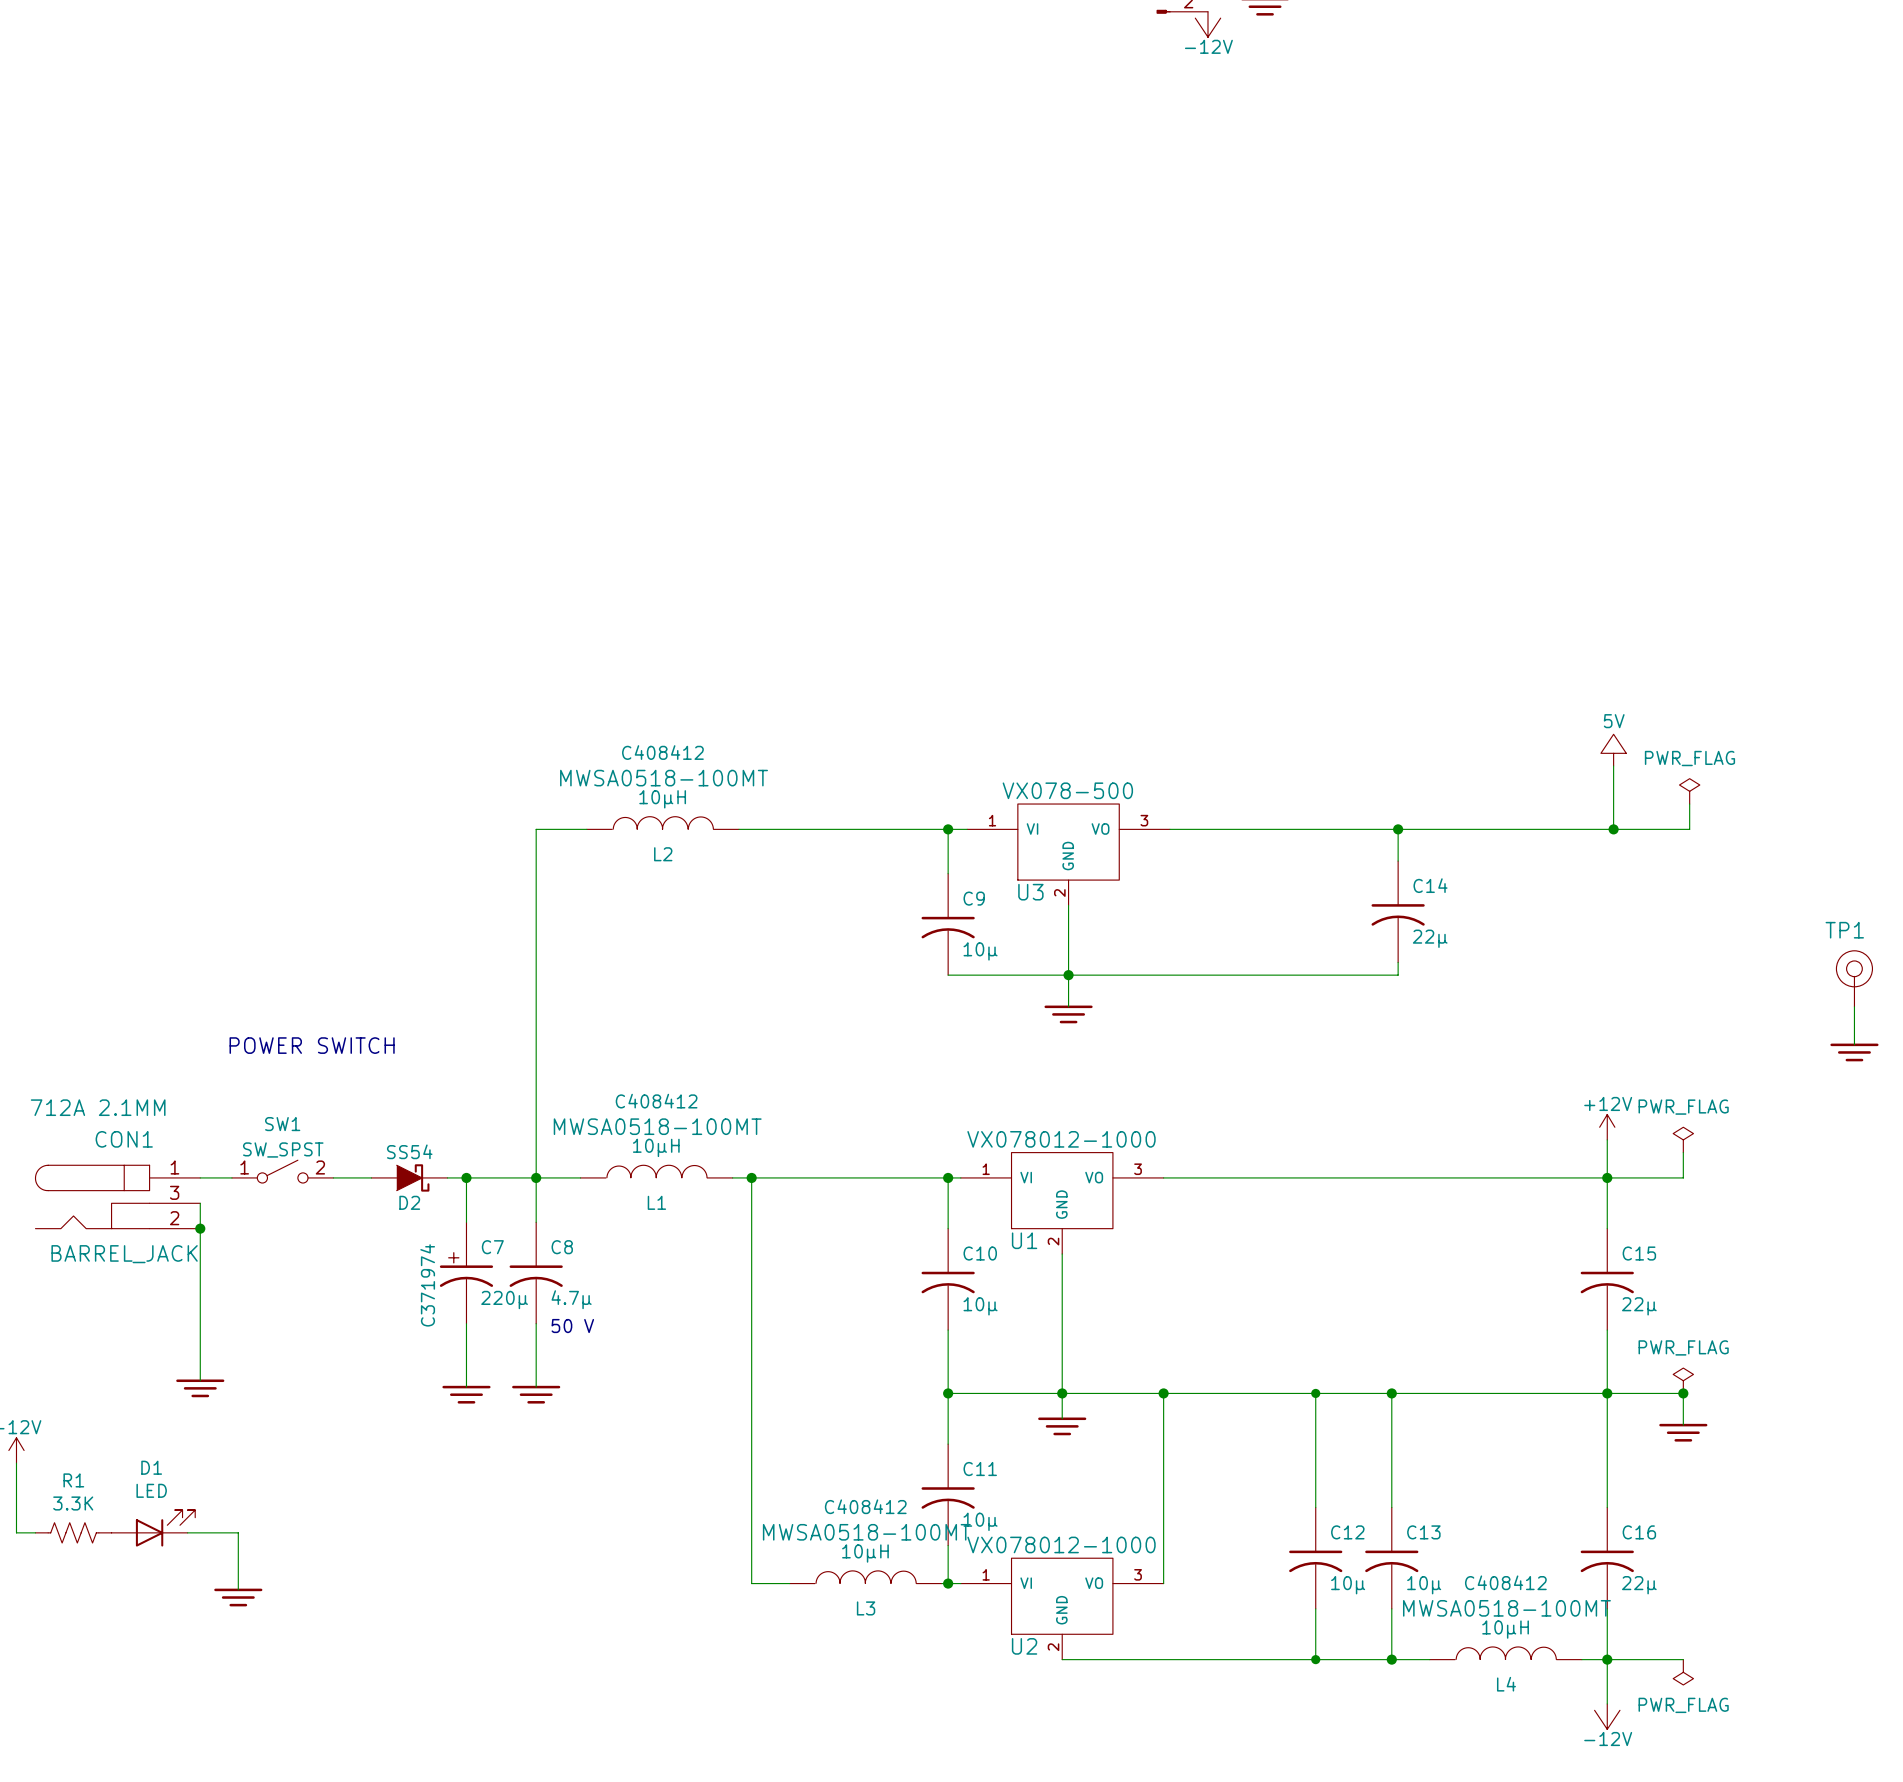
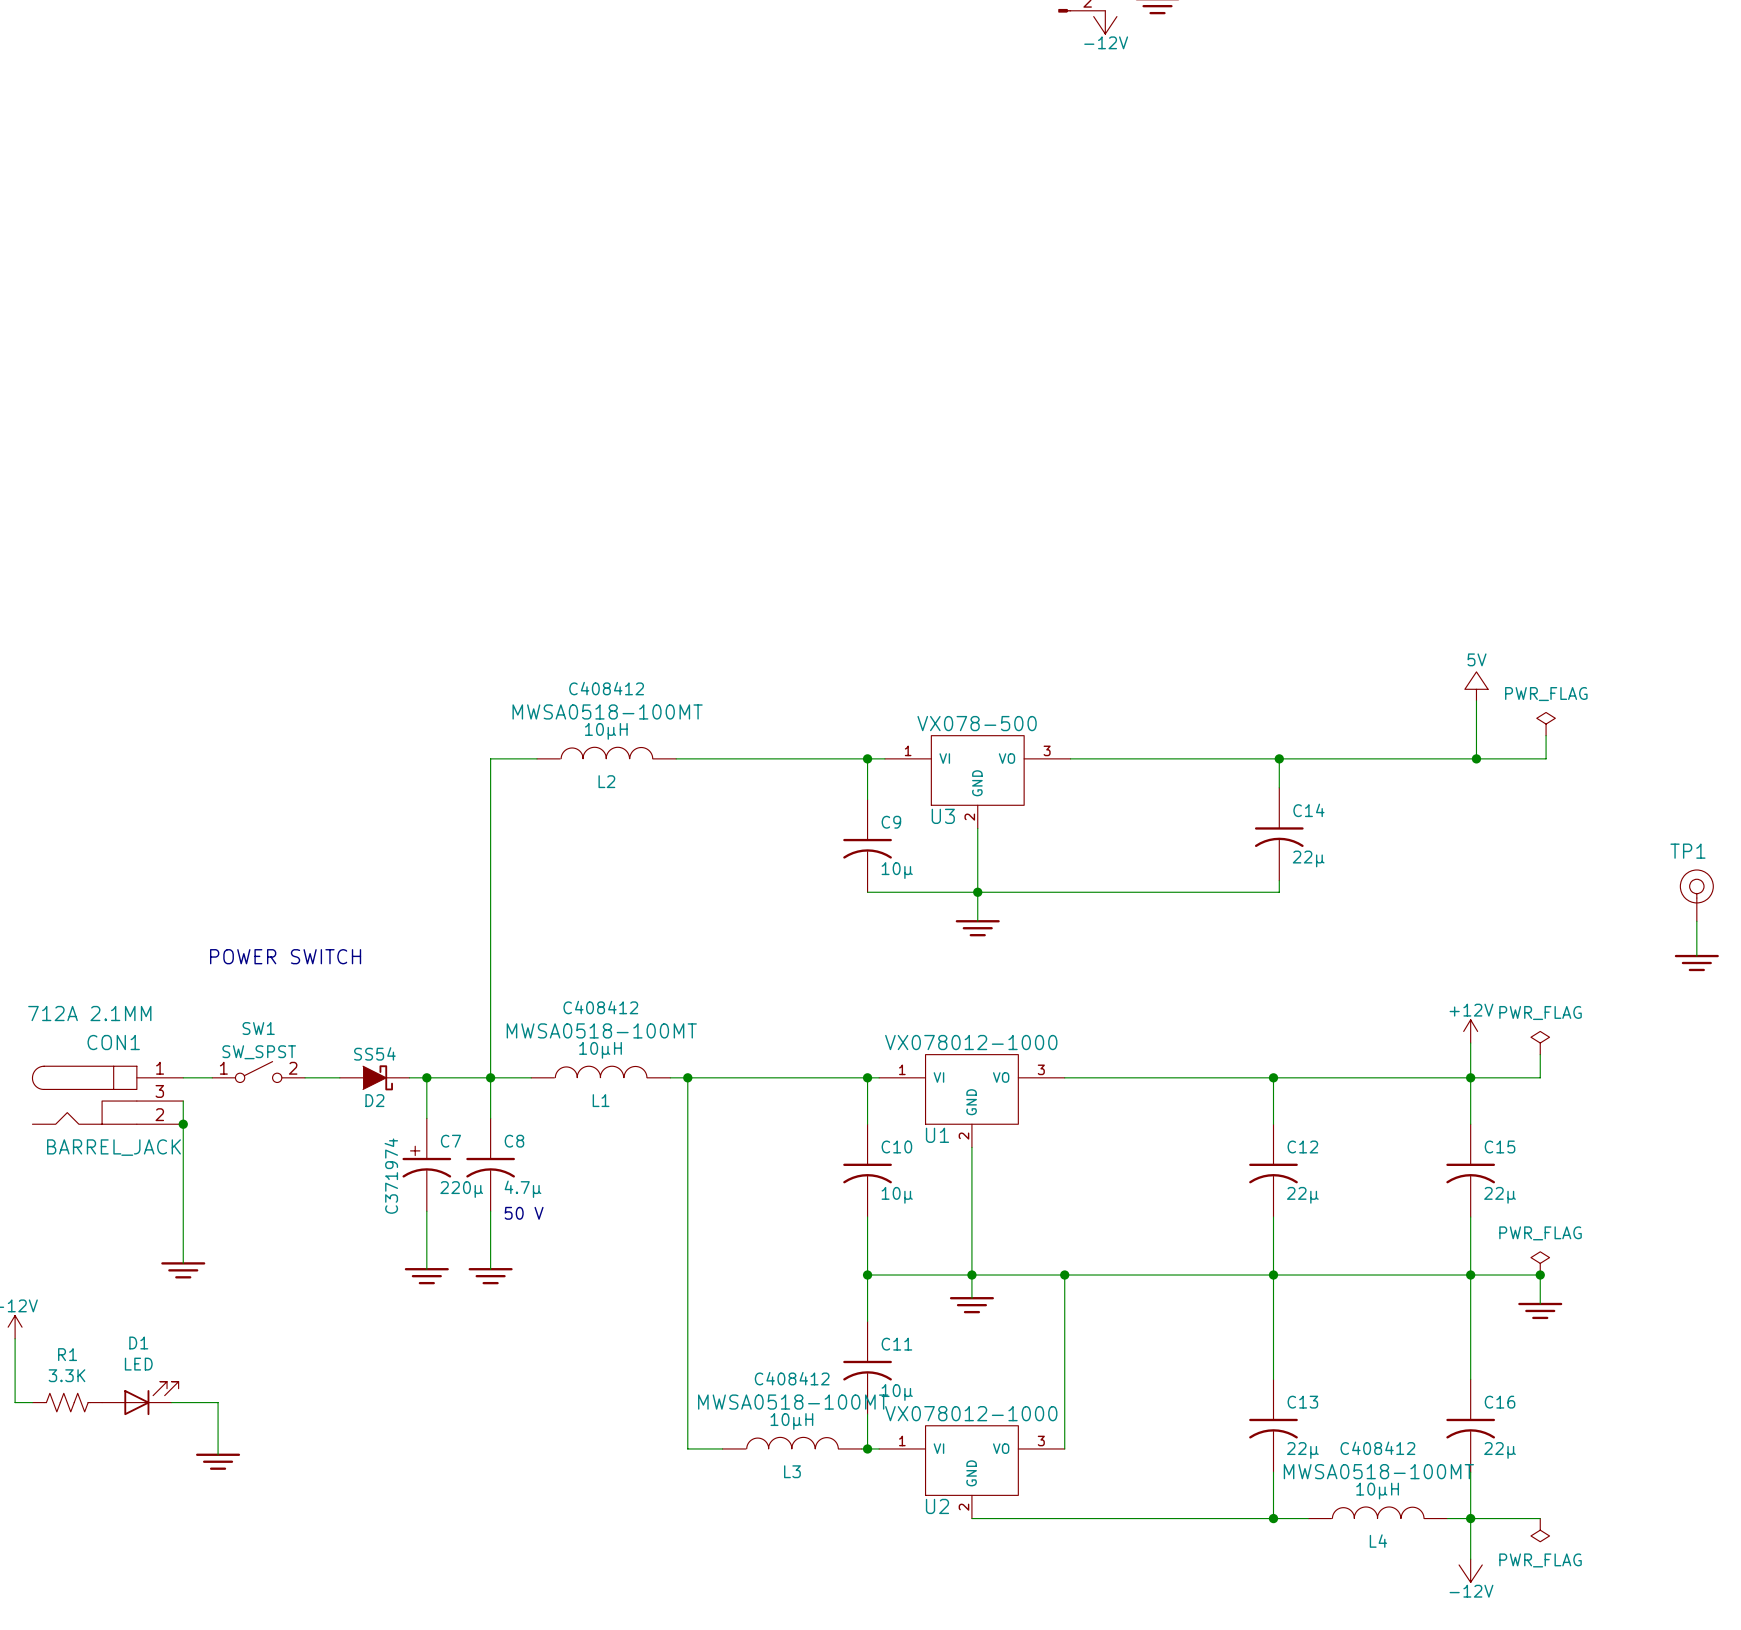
wire: none -> (1273, 1077) (1273, 1124)
junction: none -> (1273, 1077)
wire: none -> (1273, 1217) (1273, 1275)
wire: (1315, 1393) (1315, 1507) -> none
junction: (1315, 1393) -> none
C12 position: (1315, 1558) -> (1273, 1170)
C12 value: 10µ (1348, 1585) -> 22µ (1302, 1195)
C13 value: 10µ (1424, 1585) -> 22µ (1302, 1450)
wire: (1315, 1608) (1315, 1659) -> none
junction: (1315, 1659) -> none

